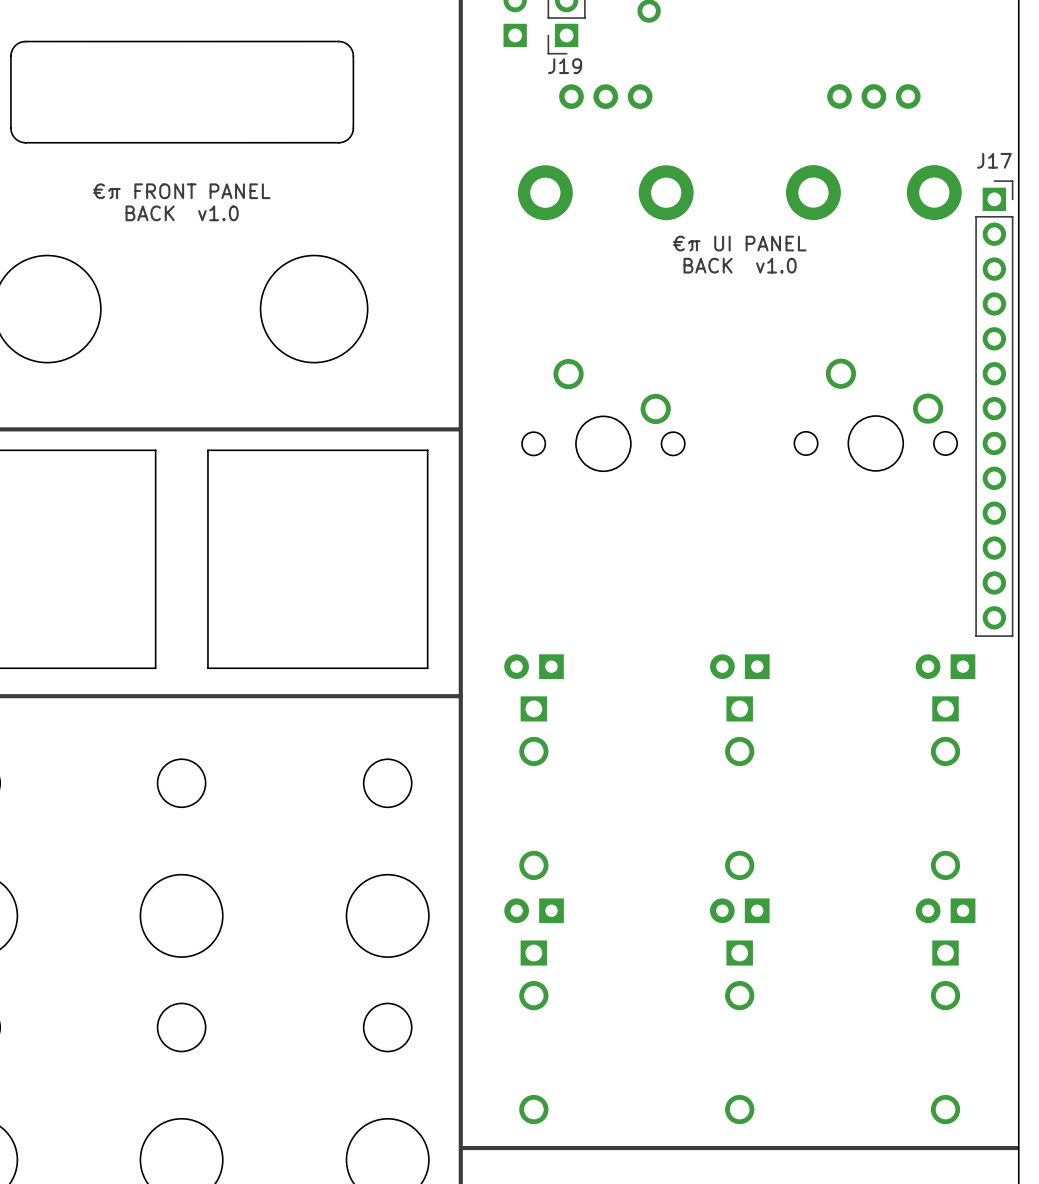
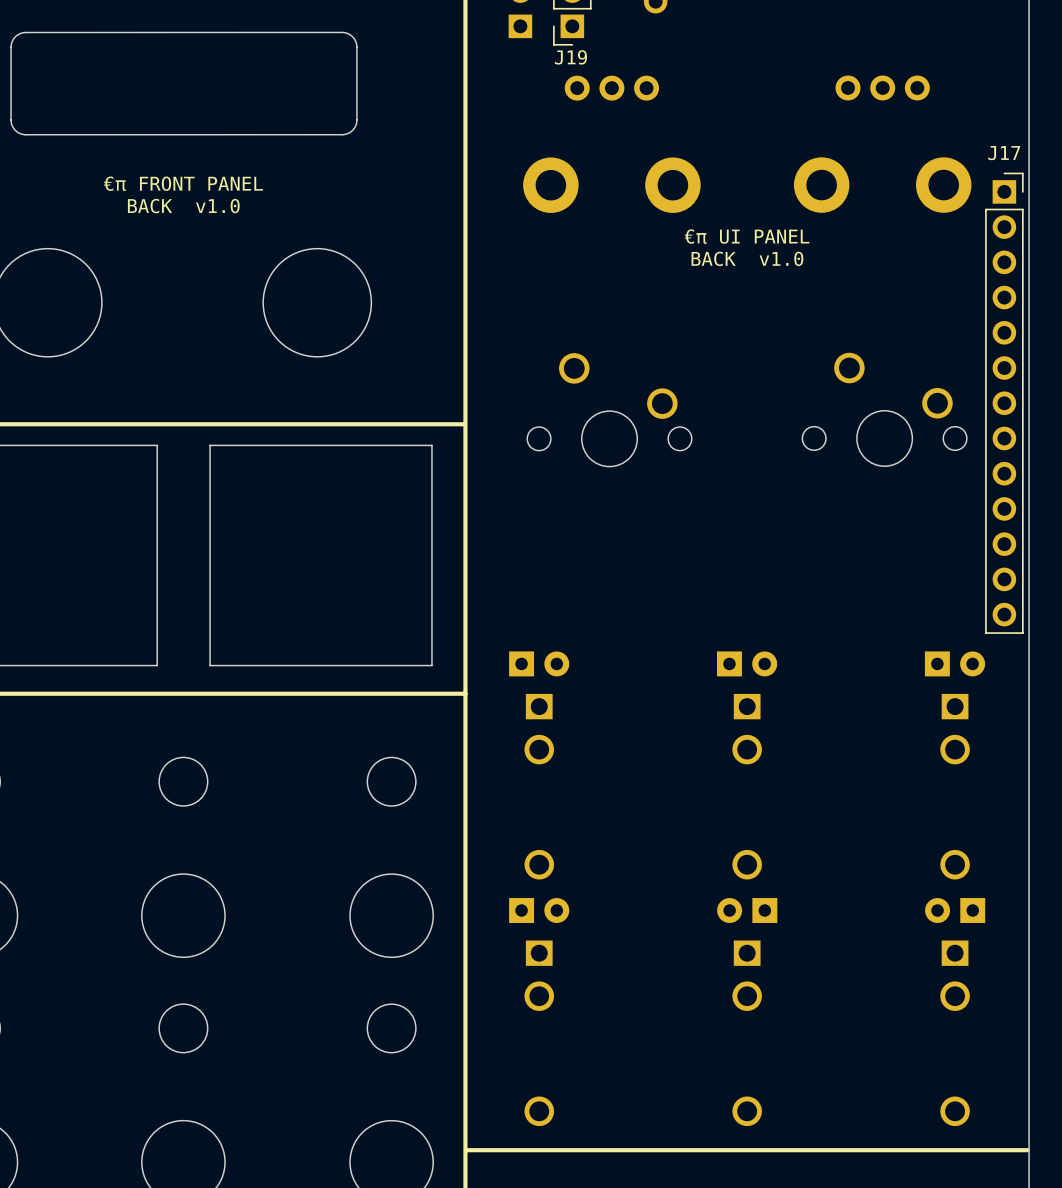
part rotation: 0° (534, 666) -> 180° (539, 663)
part rotation: 0° (739, 666) -> 180° (747, 663)
part rotation: 0° (945, 666) -> 180° (955, 663)
part rotation: 0° (534, 910) -> 180° (539, 910)

